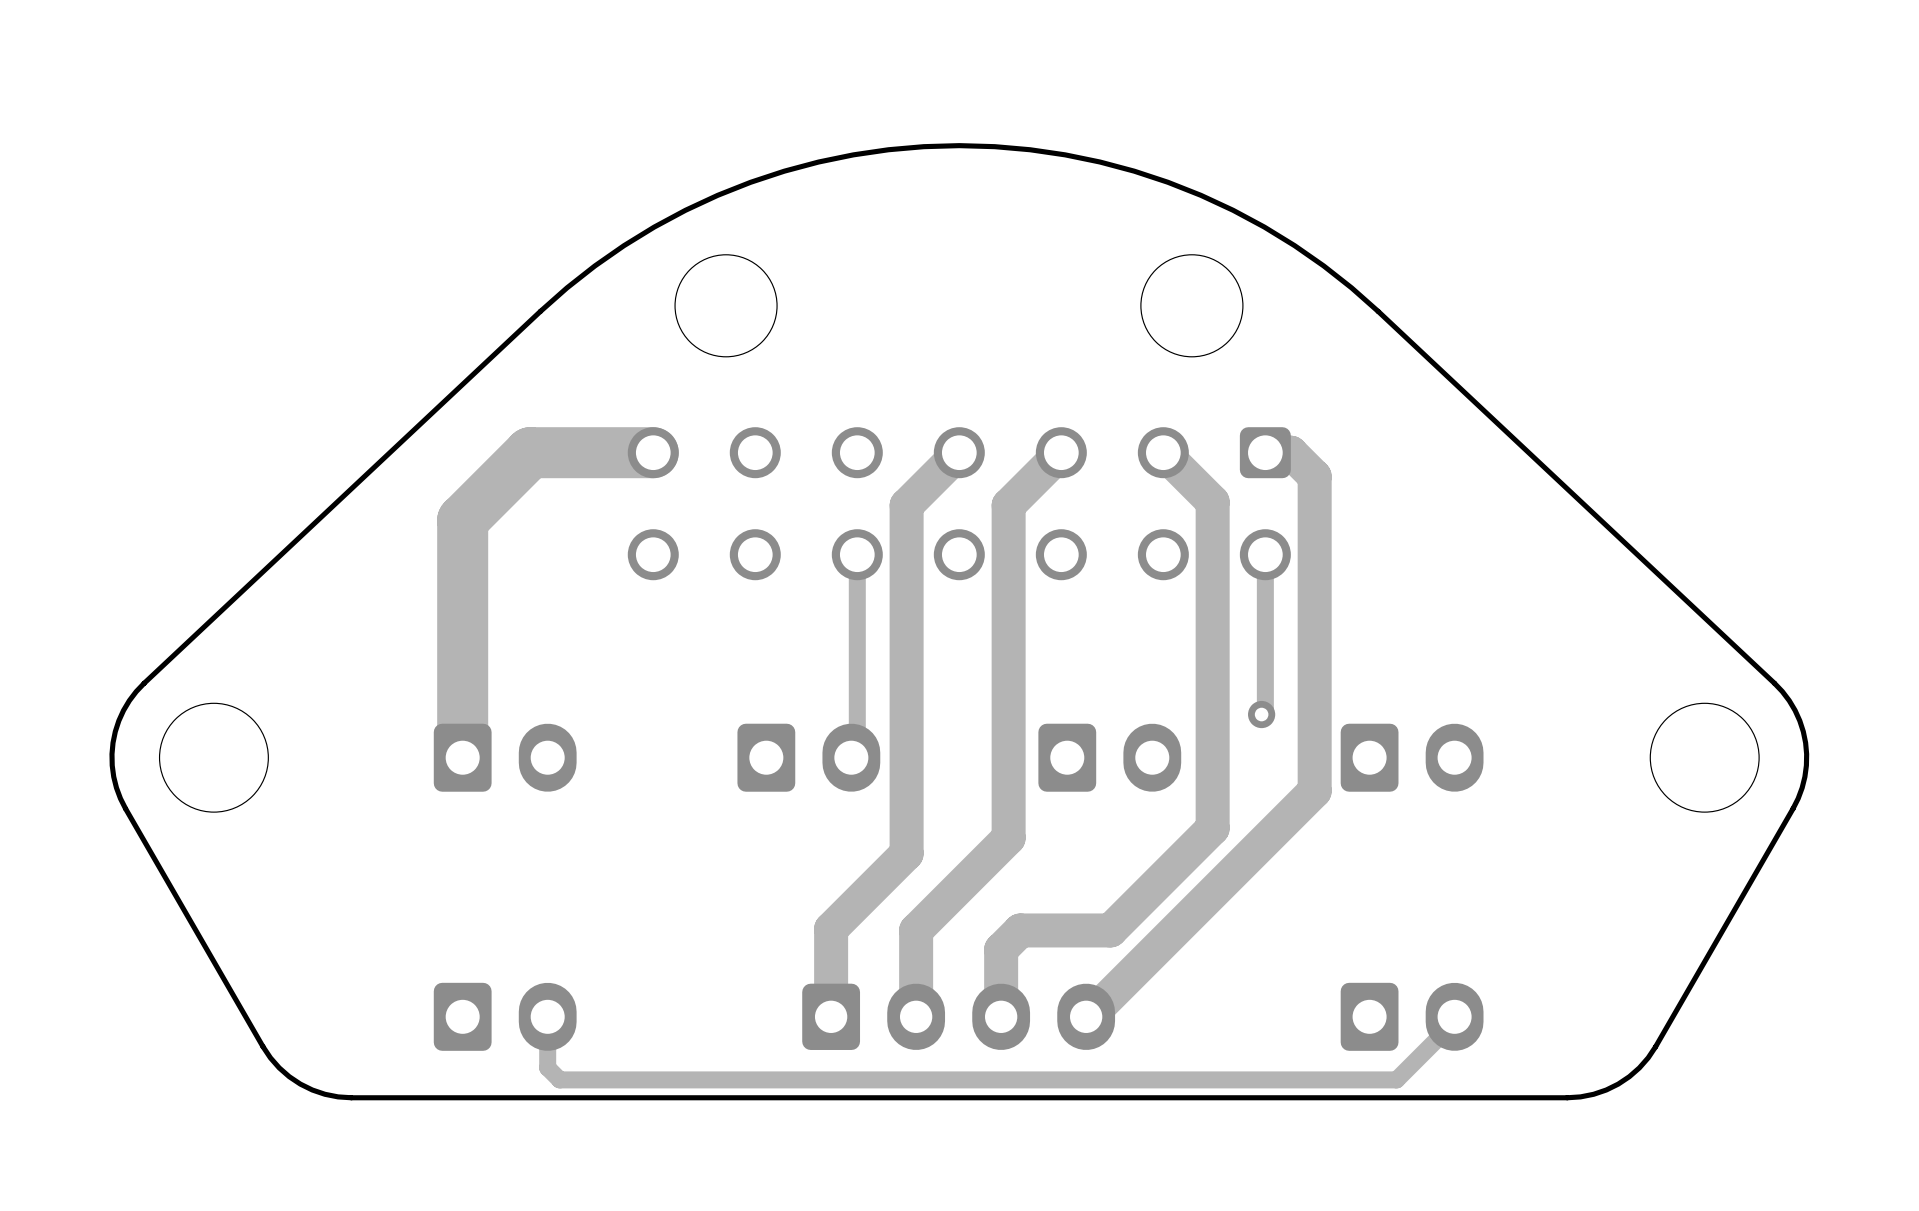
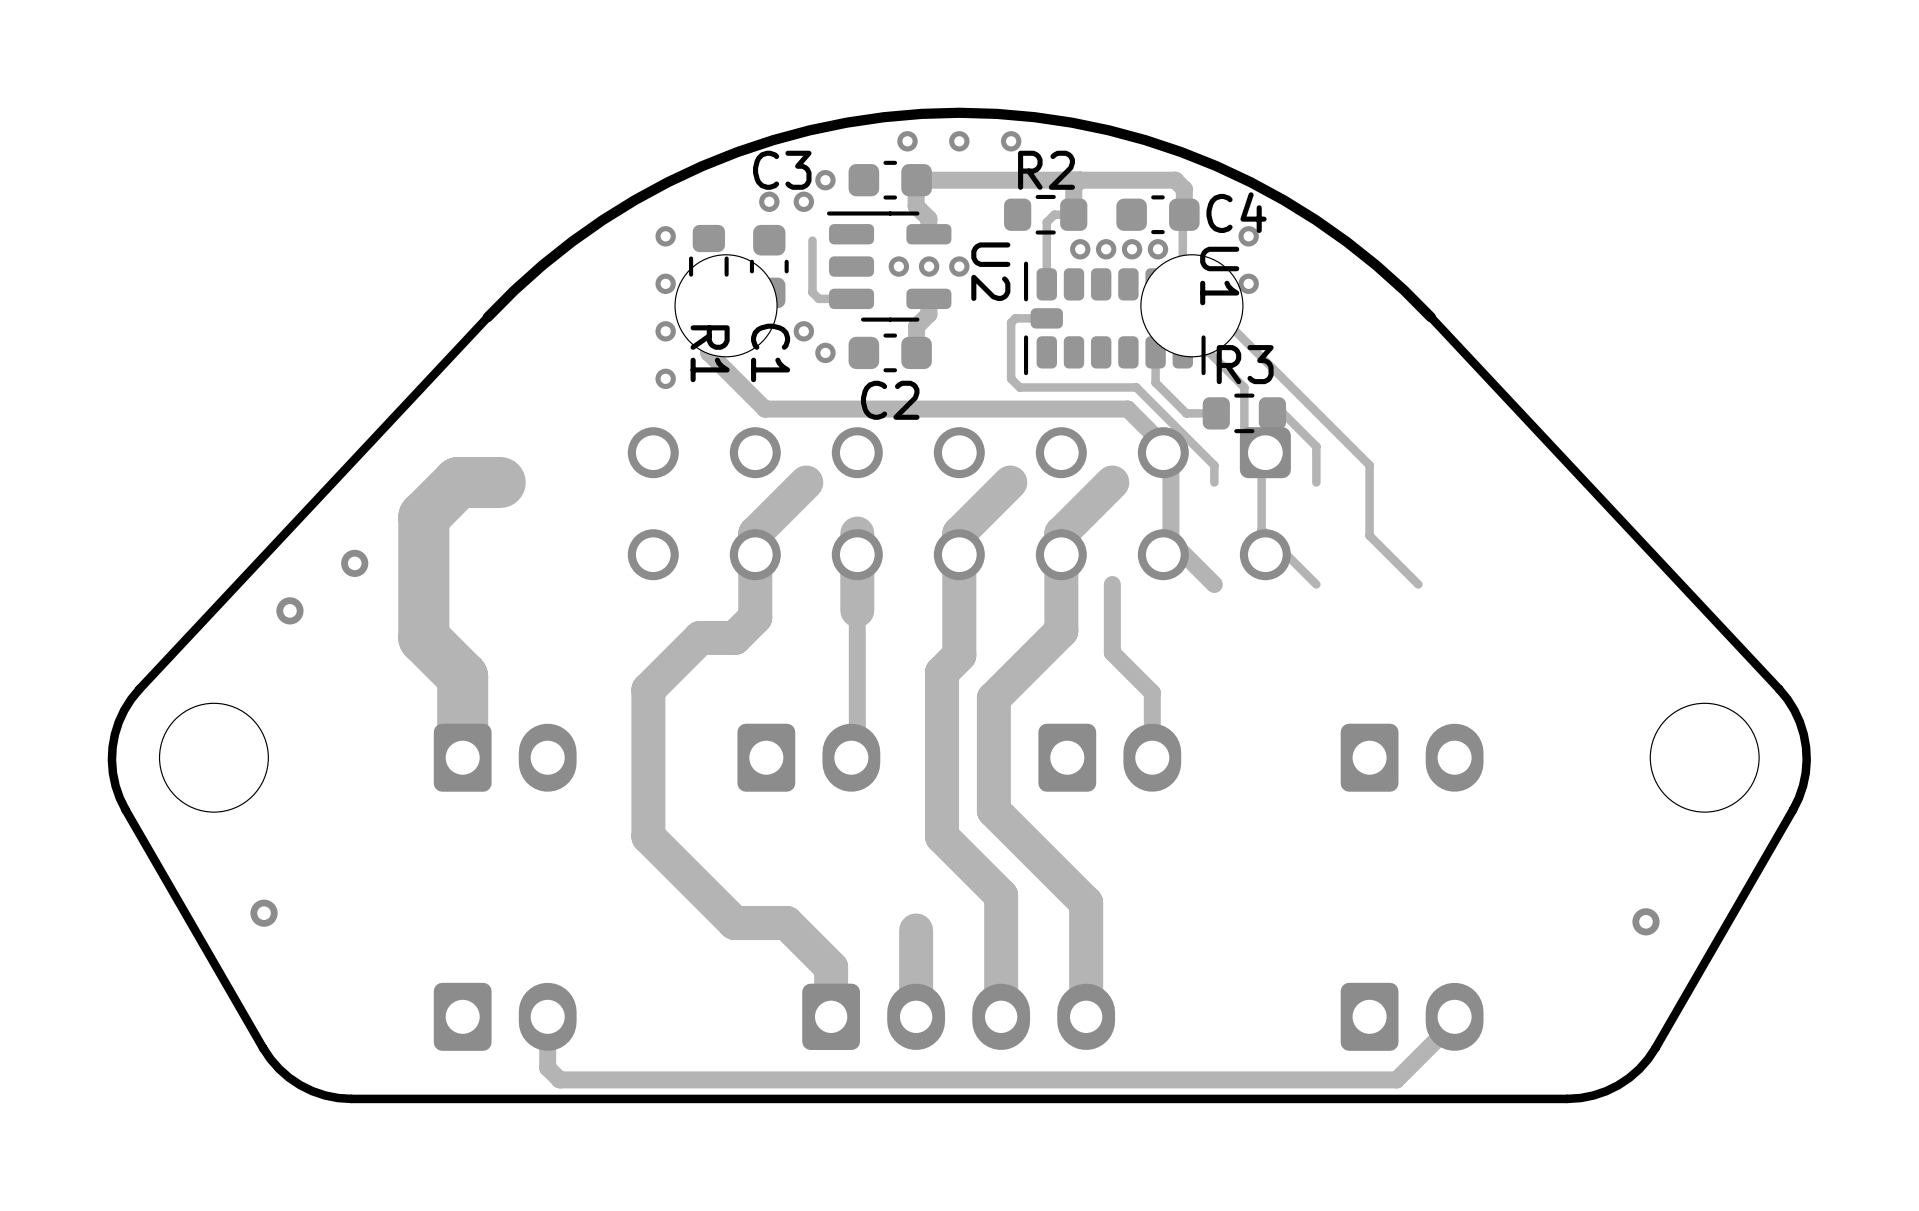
via: none -> (907, 141)
via: none -> (959, 141)
via: none -> (1011, 141)
via: none -> (825, 180)
C3: none -> (890, 180)
track: none -> (916, 180) (1175, 180) (1184, 189) (1182, 284)
track: none -> (916, 180) (916, 206) (928, 218) (928, 234)
track: none -> (1080, 180) (1073, 186) (1073, 214) (1054, 214) (1046, 222) (1046, 284)
via: none -> (769, 201)
via: none -> (803, 201)
R2: none -> (1045, 214)
C4: none -> (1157, 214)
via: none -> (665, 236)
via: none -> (1248, 236)
track: none -> (812, 240) (812, 292) (818, 298) (851, 298)
via: none -> (1080, 249)
via: none -> (1106, 249)
via: none -> (1132, 249)
via: none -> (1157, 249)
R1: none -> (708, 266)
C1: none -> (769, 266)
U2: none -> (889, 266)
via: none -> (898, 266)
via: none -> (929, 266)
via: none -> (959, 266)
via: none -> (665, 283)
via: none -> (1248, 283)
track: none -> (708, 294) (708, 352) (764, 409) (1127, 409) (1170, 452) (1170, 541) (1214, 584)
track: none -> (928, 298) (928, 314) (916, 326) (916, 352)
board edge: (1378, 311) (1774, 683) (1789, 700) (1803, 731) (1806, 765) (1802, 787) (1793, 808) (1655, 1046) (1639, 1067) (1629, 1076) (1606, 1089) (1580, 1096) (1567, 1097) (338, 1096) (312, 1089) (300, 1084) (279, 1067) (270, 1057) (120, 798) (112, 765) (115, 731) (123, 710) (144, 683) (567, 287) (594, 265) (654, 227) (717, 195) (750, 182) (818, 162) (888, 149) (923, 146) (994, 146) (1065, 154) (1134, 171) (1200, 195) (1233, 210) (1294, 245) (1323, 265) (1378, 311) -> (1430, 317) (1779, 689) (1794, 710) (1803, 734) (1806, 747) (1805, 773) (1798, 798) (1793, 809) (1655, 1047) (1648, 1059) (1629, 1077) (1606, 1091) (1593, 1095) (1567, 1098) (338, 1098) (324, 1095) (300, 1085) (289, 1077) (270, 1059) (119, 798) (112, 773) (112, 747) (118, 722) (131, 699) (487, 317) (542, 265) (602, 220) (668, 182) (737, 152) (809, 130) (846, 122) (921, 113) (997, 113) (1034, 117) (1108, 130) (1181, 152) (1216, 166) (1283, 200) (1346, 241) (1376, 265) (1430, 317)
track: none -> (1046, 318) (1015, 318) (1011, 322) (1011, 378) (1019, 387) (1136, 387) (1214, 465) (1214, 482)
U1: none -> (1114, 318)
track: none -> (1182, 318) (1222, 318) (1369, 465) (1369, 535) (1418, 584)
via: none -> (665, 331)
via: none -> (803, 331)
via: none -> (825, 352)
C2: none -> (890, 352)
track: none -> (1155, 352) (1155, 382) (1186, 413) (1216, 413)
track: none -> (1182, 352) (1209, 352) (1244, 387) (1244, 439) (1261, 456) (1261, 529) (1316, 584)
via: none -> (665, 378)
R3: none -> (1244, 413)
track: none -> (1272, 413) (1283, 413) (1316, 446) (1316, 482)
track: (653, 452) (530, 452) (462, 520) (462, 676) -> (500, 482) (458, 482) (423, 517) (423, 637) (462, 676)
track: (959, 452) (906, 505) (906, 853) (831, 929) (831, 967) -> (806, 482) (755, 533) (755, 617) (734, 637) (700, 637) (648, 689) (648, 836) (734, 922) (786, 922) (831, 967)
track: (1061, 452) (1008, 505) (1008, 837) (916, 930) -> none
track: (1163, 452) (1212, 502) (1212, 828) (1110, 930) (1020, 930) (1001, 949) -> (1010, 482) (959, 533) (959, 655) (942, 672) (942, 836) (1001, 895) (1001, 949)
track: (1265, 452) (1290, 452) (1314, 476) (1314, 791) (1088, 1016) -> none
track: none -> (1112, 482) (1061, 533) (1061, 630) (993, 698) (993, 810) (1086, 902) (1086, 1010)
track width: thin (857, 554) (857, 751) -> thick (857, 554) (857, 751)
track: (1265, 554) (1265, 710) (1261, 714) -> none
via: none -> (354, 563)
track: none -> (1112, 584) (1112, 652) (1152, 692) (1152, 757)
via: none -> (289, 610)
via: (1261, 714) -> none
via: none -> (264, 913)
via: none -> (1645, 921)

